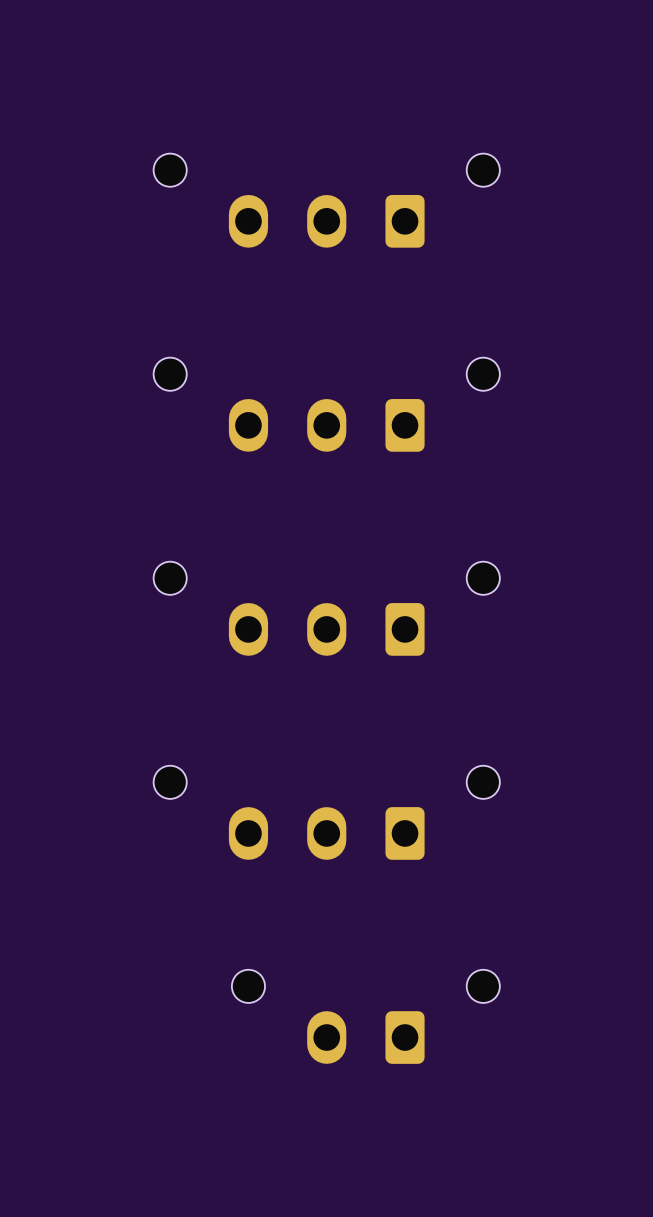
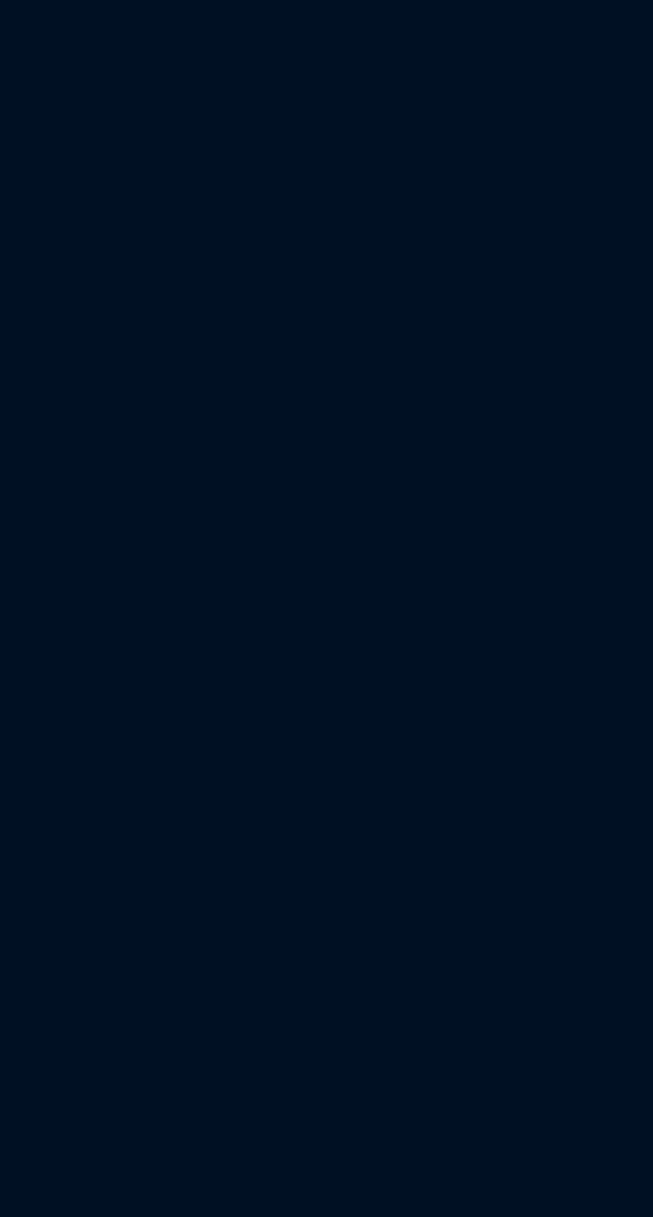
part: (326, 200) -> none
part: (326, 404) -> none
part: (326, 608) -> none
part: (326, 812) -> none
part: (365, 1016) -> none

